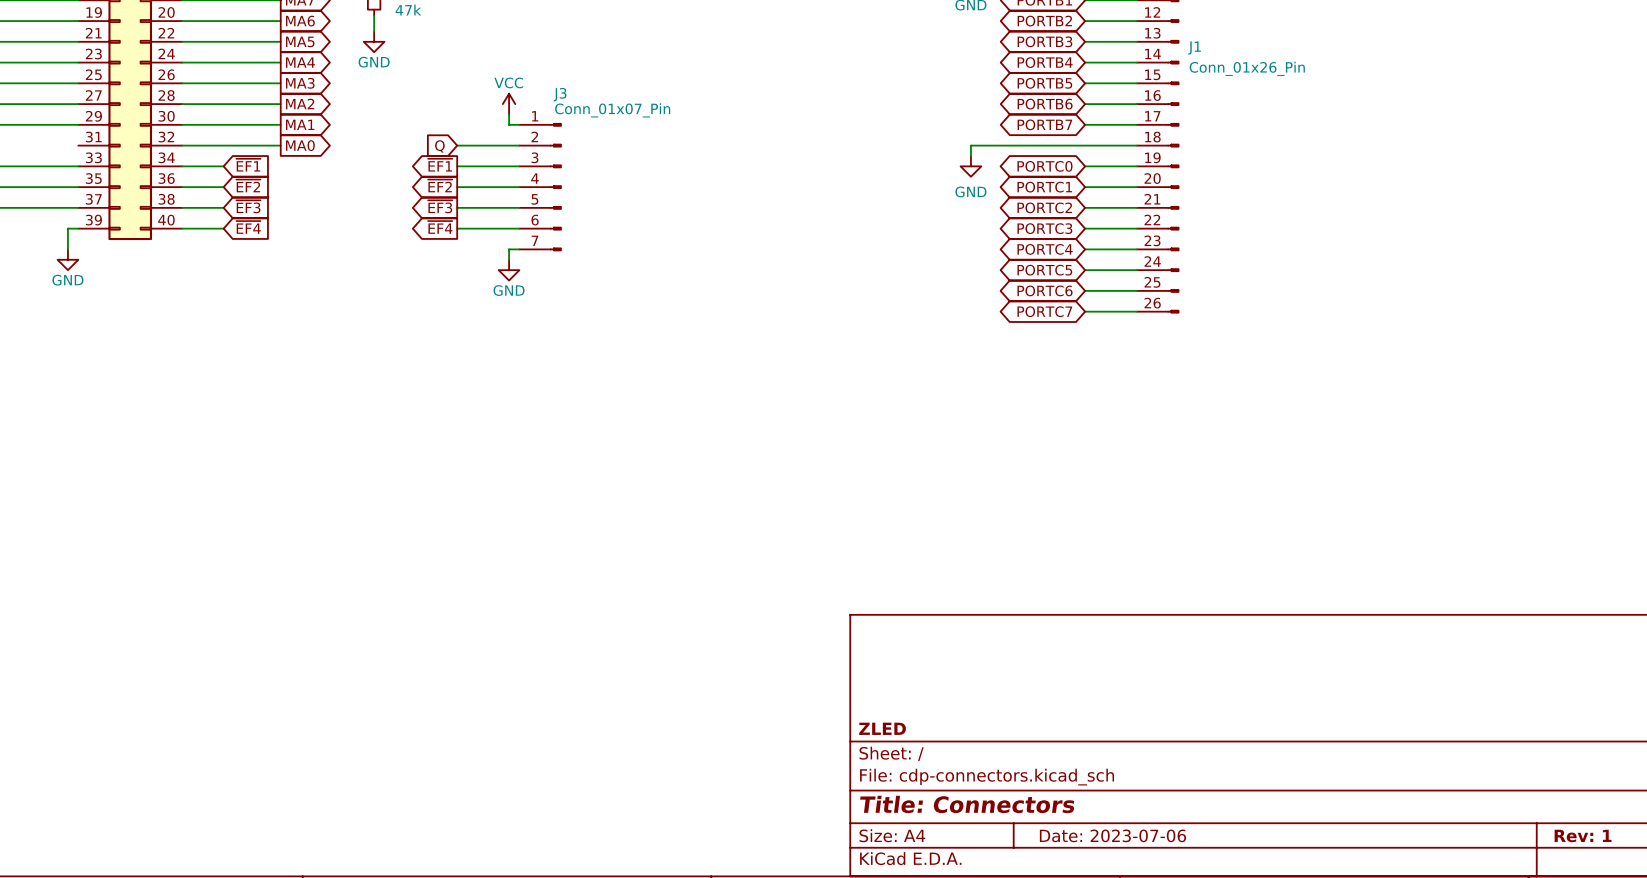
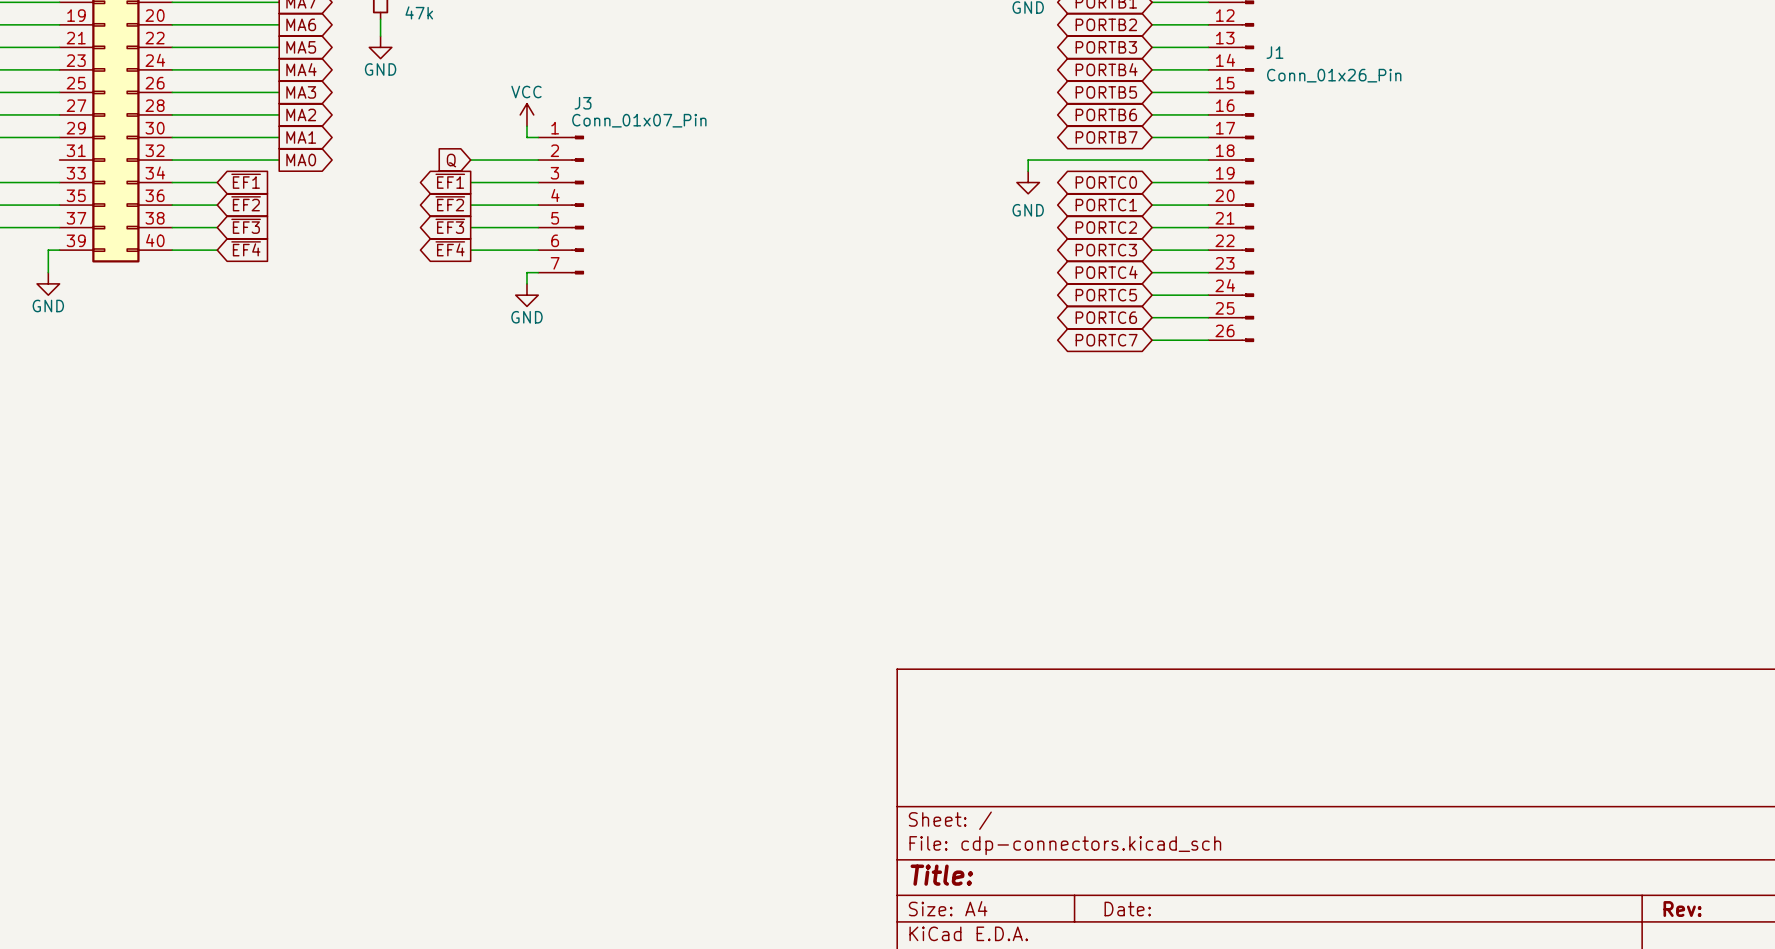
title block: ZLED (882, 728) -> none
title block: Title: Connectors (967, 804) -> Title: (941, 875)
title block: Date: 2023-07-06 (1112, 835) -> Date: (1127, 909)
title block: Rev: 1 (1583, 835) -> Rev: (1682, 909)

